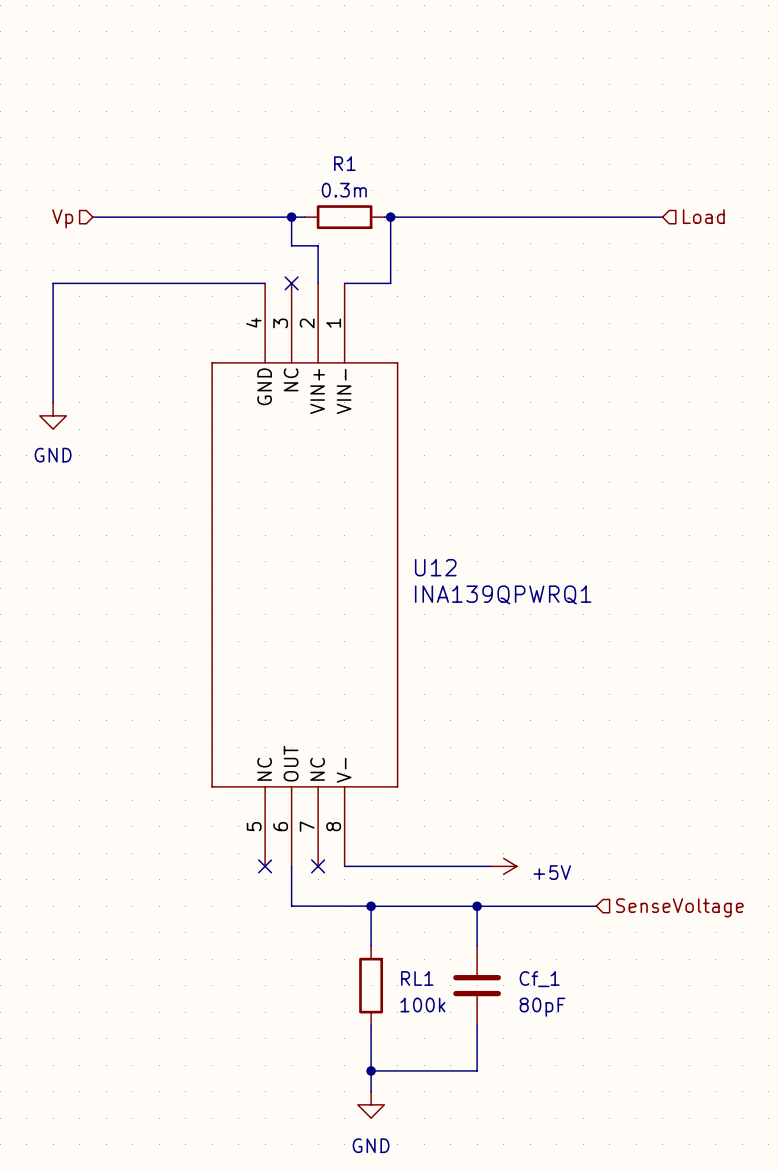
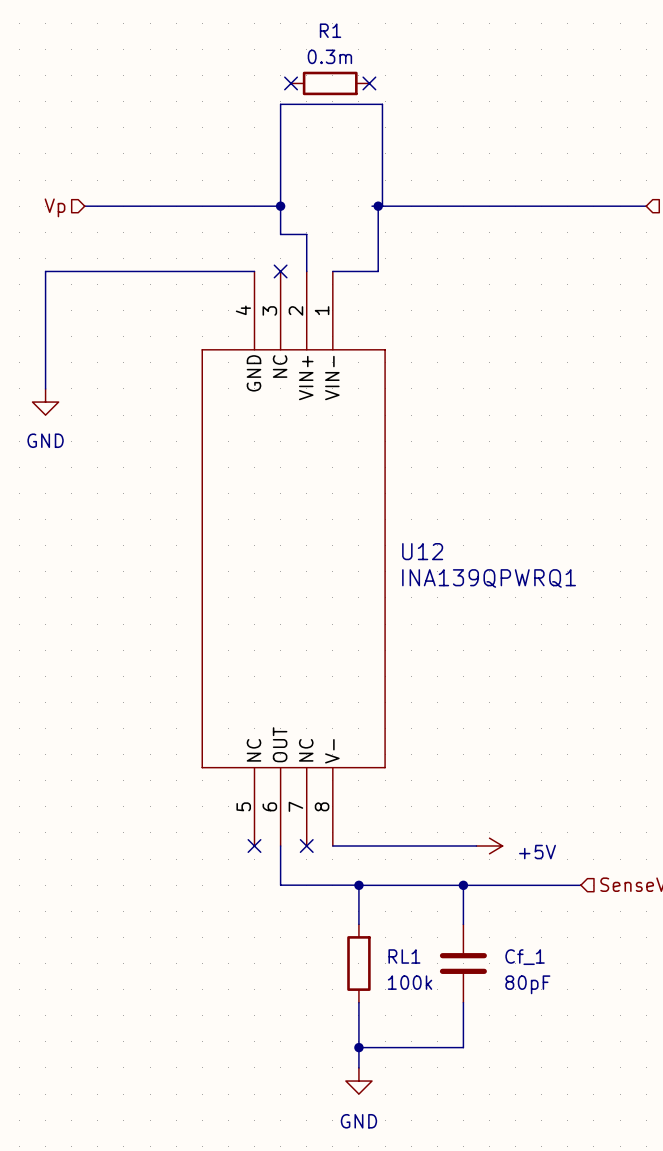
no-connect mark: none -> (291, 83)
no-connect mark: none -> (369, 83)
wire: (291, 217) (304, 217) -> (280, 206) (280, 104) (382, 104) (382, 206)
R1 position: (344, 217) -> (330, 83)

